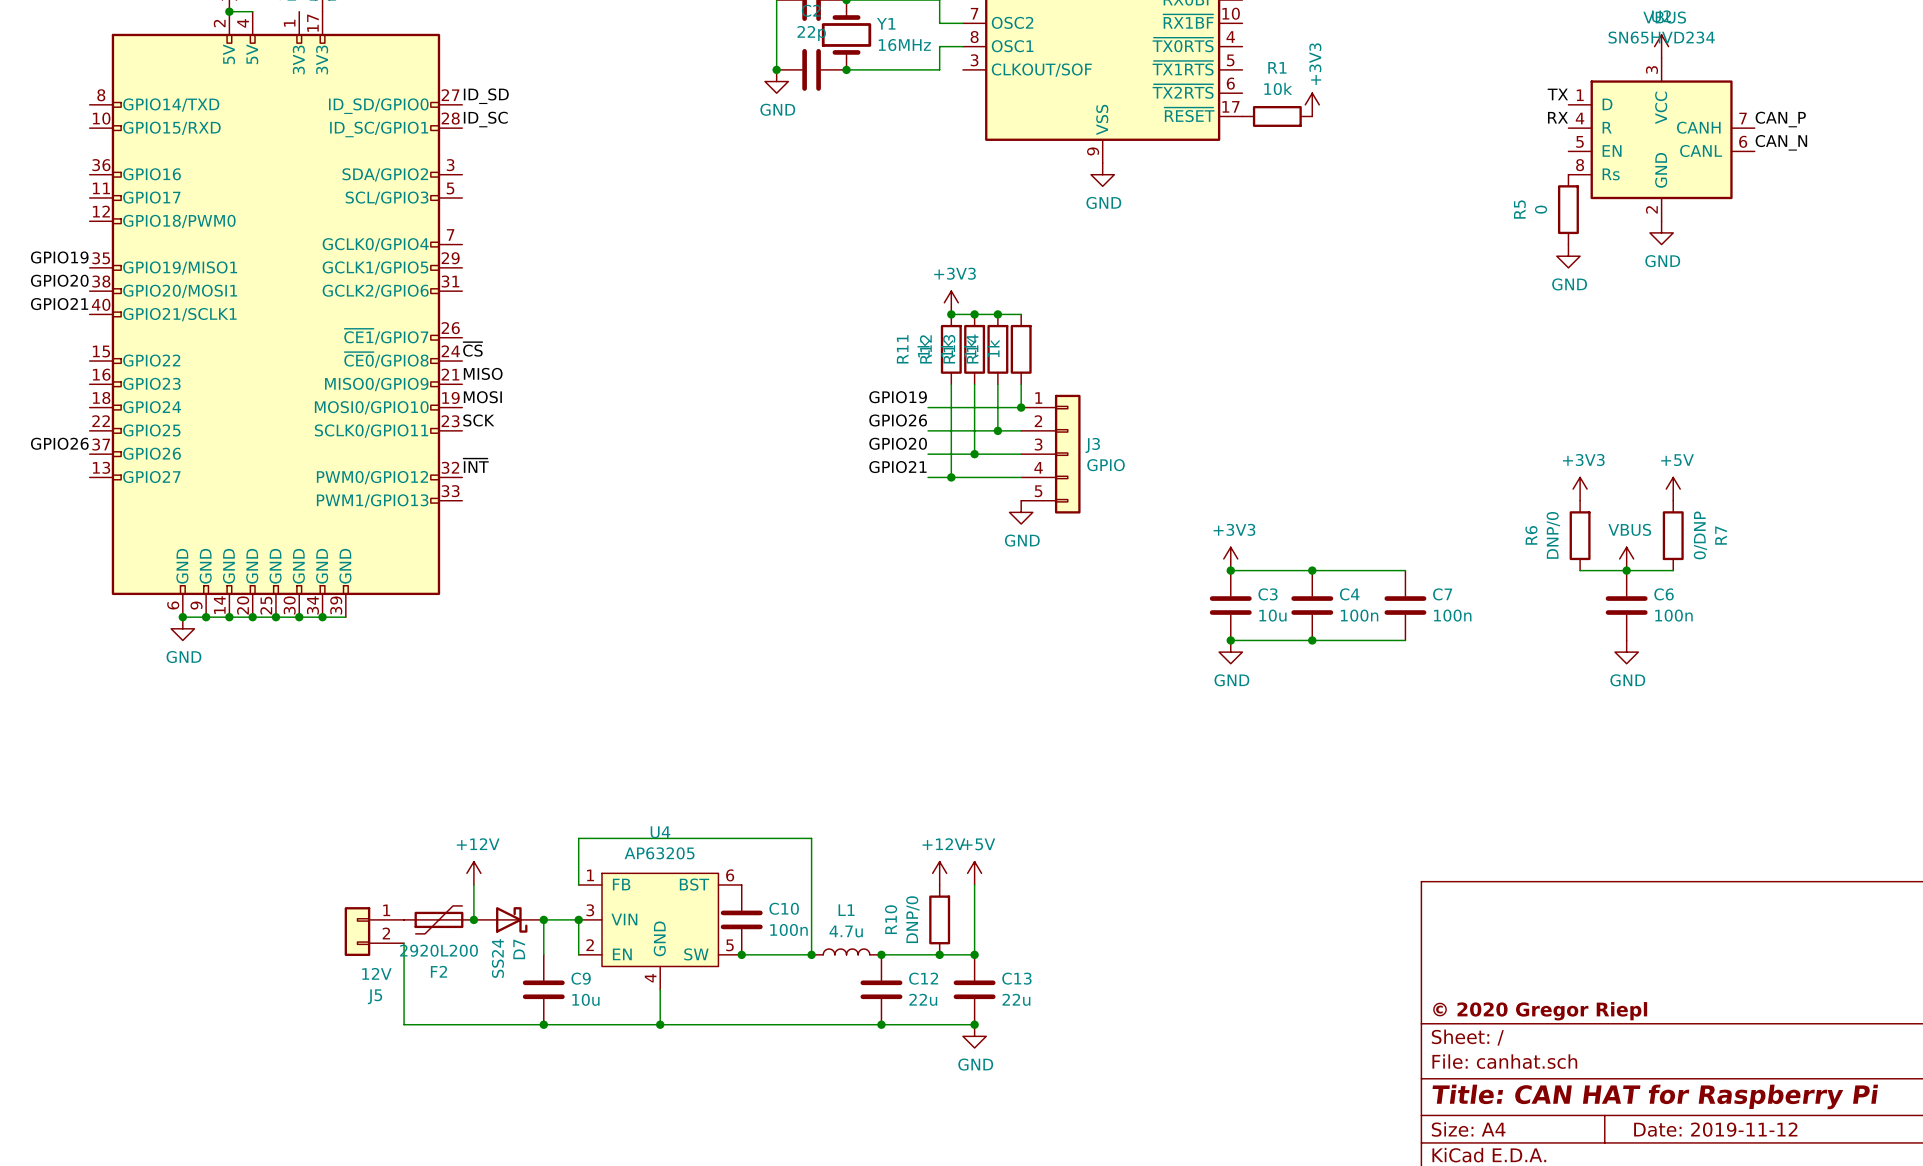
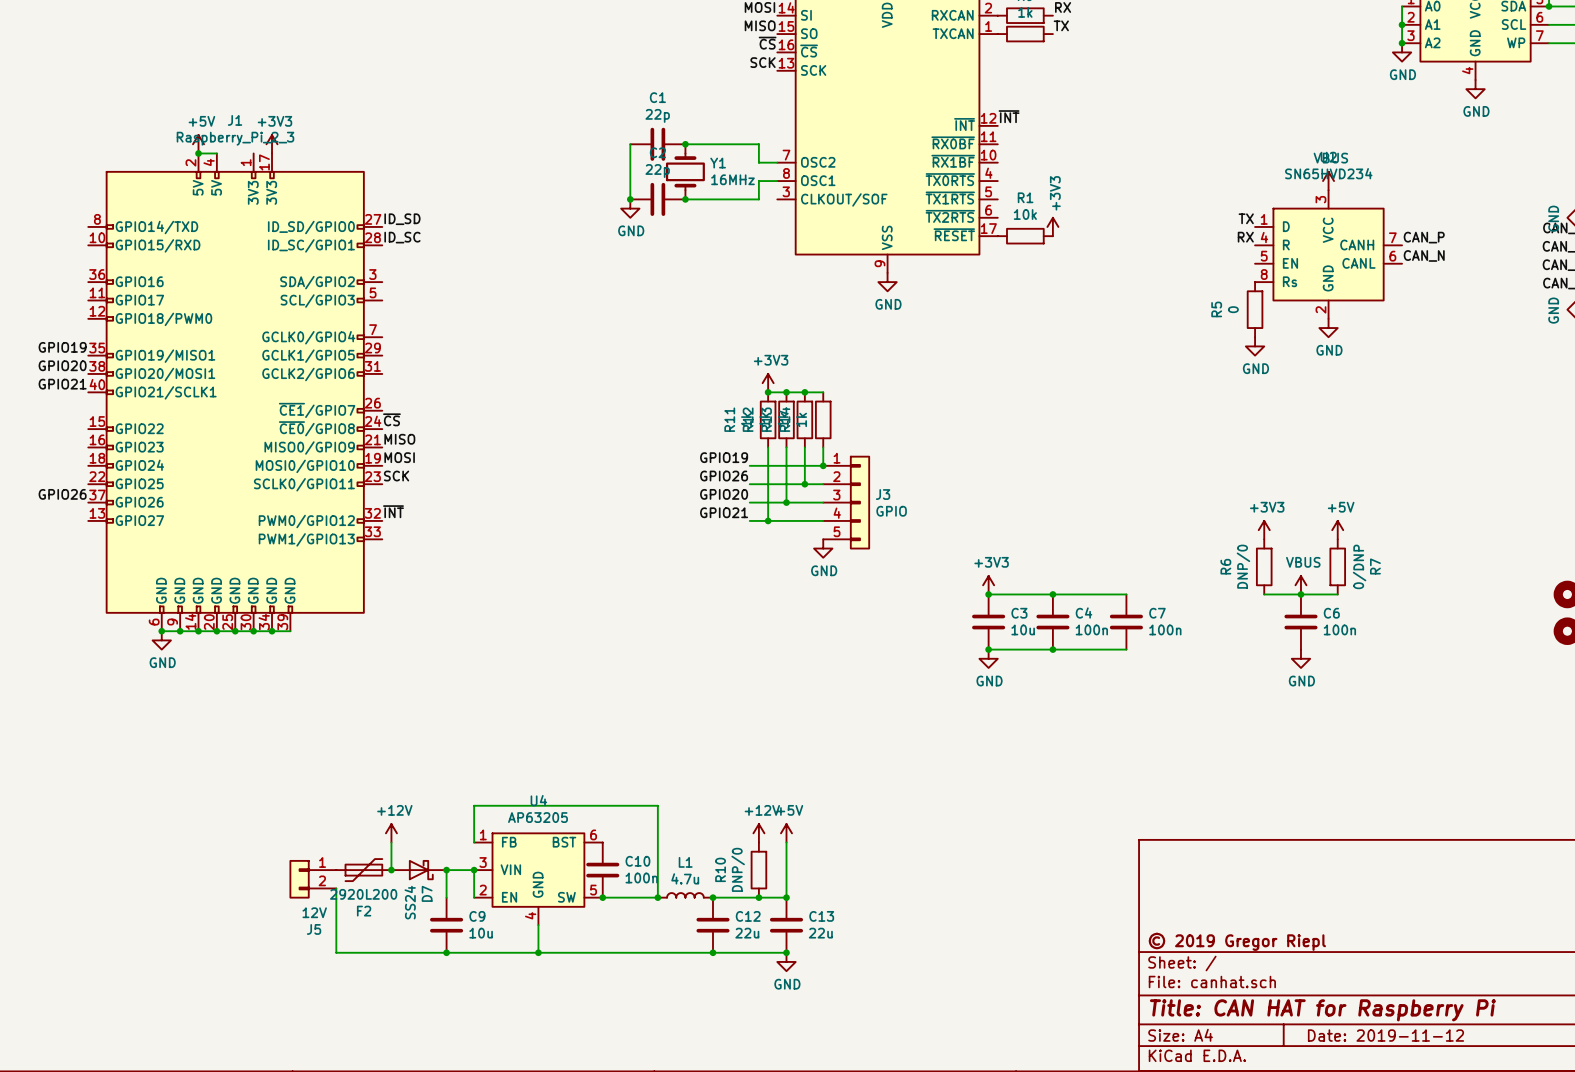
title block: © 2020 Gregor Riepl (1540, 1011) -> © 2019 Gregor Riepl (1237, 941)

